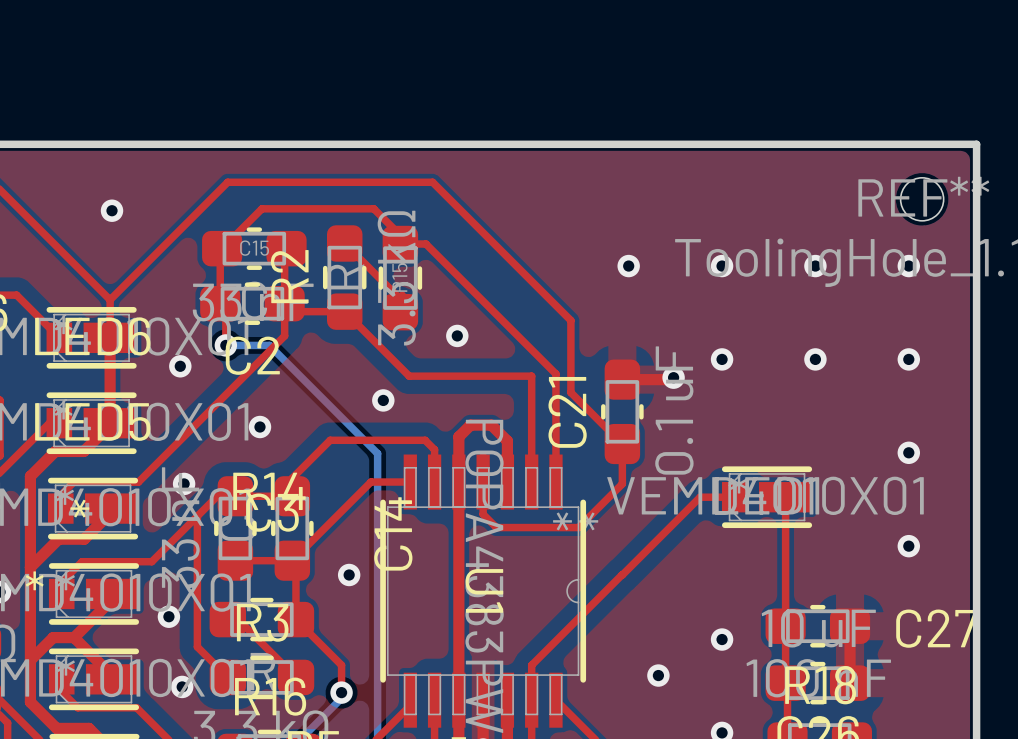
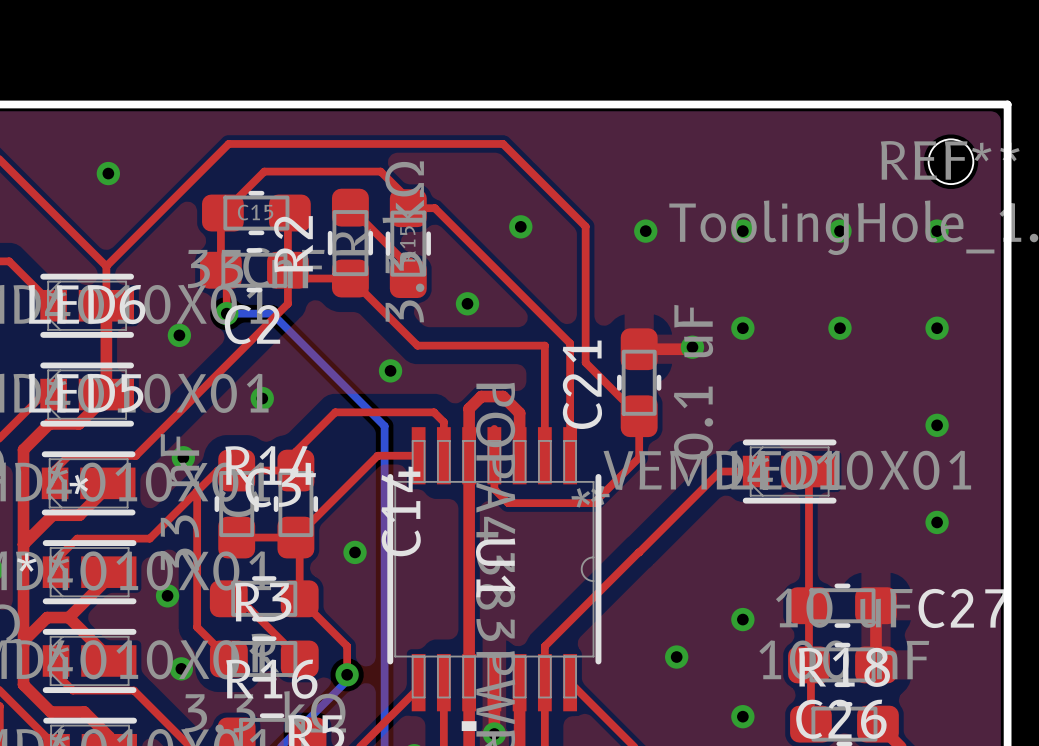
top track: (432, 182) (570, 320) -> (441, 143) (503, 143) (585, 226) (585, 287)
via: none -> (520, 226)

